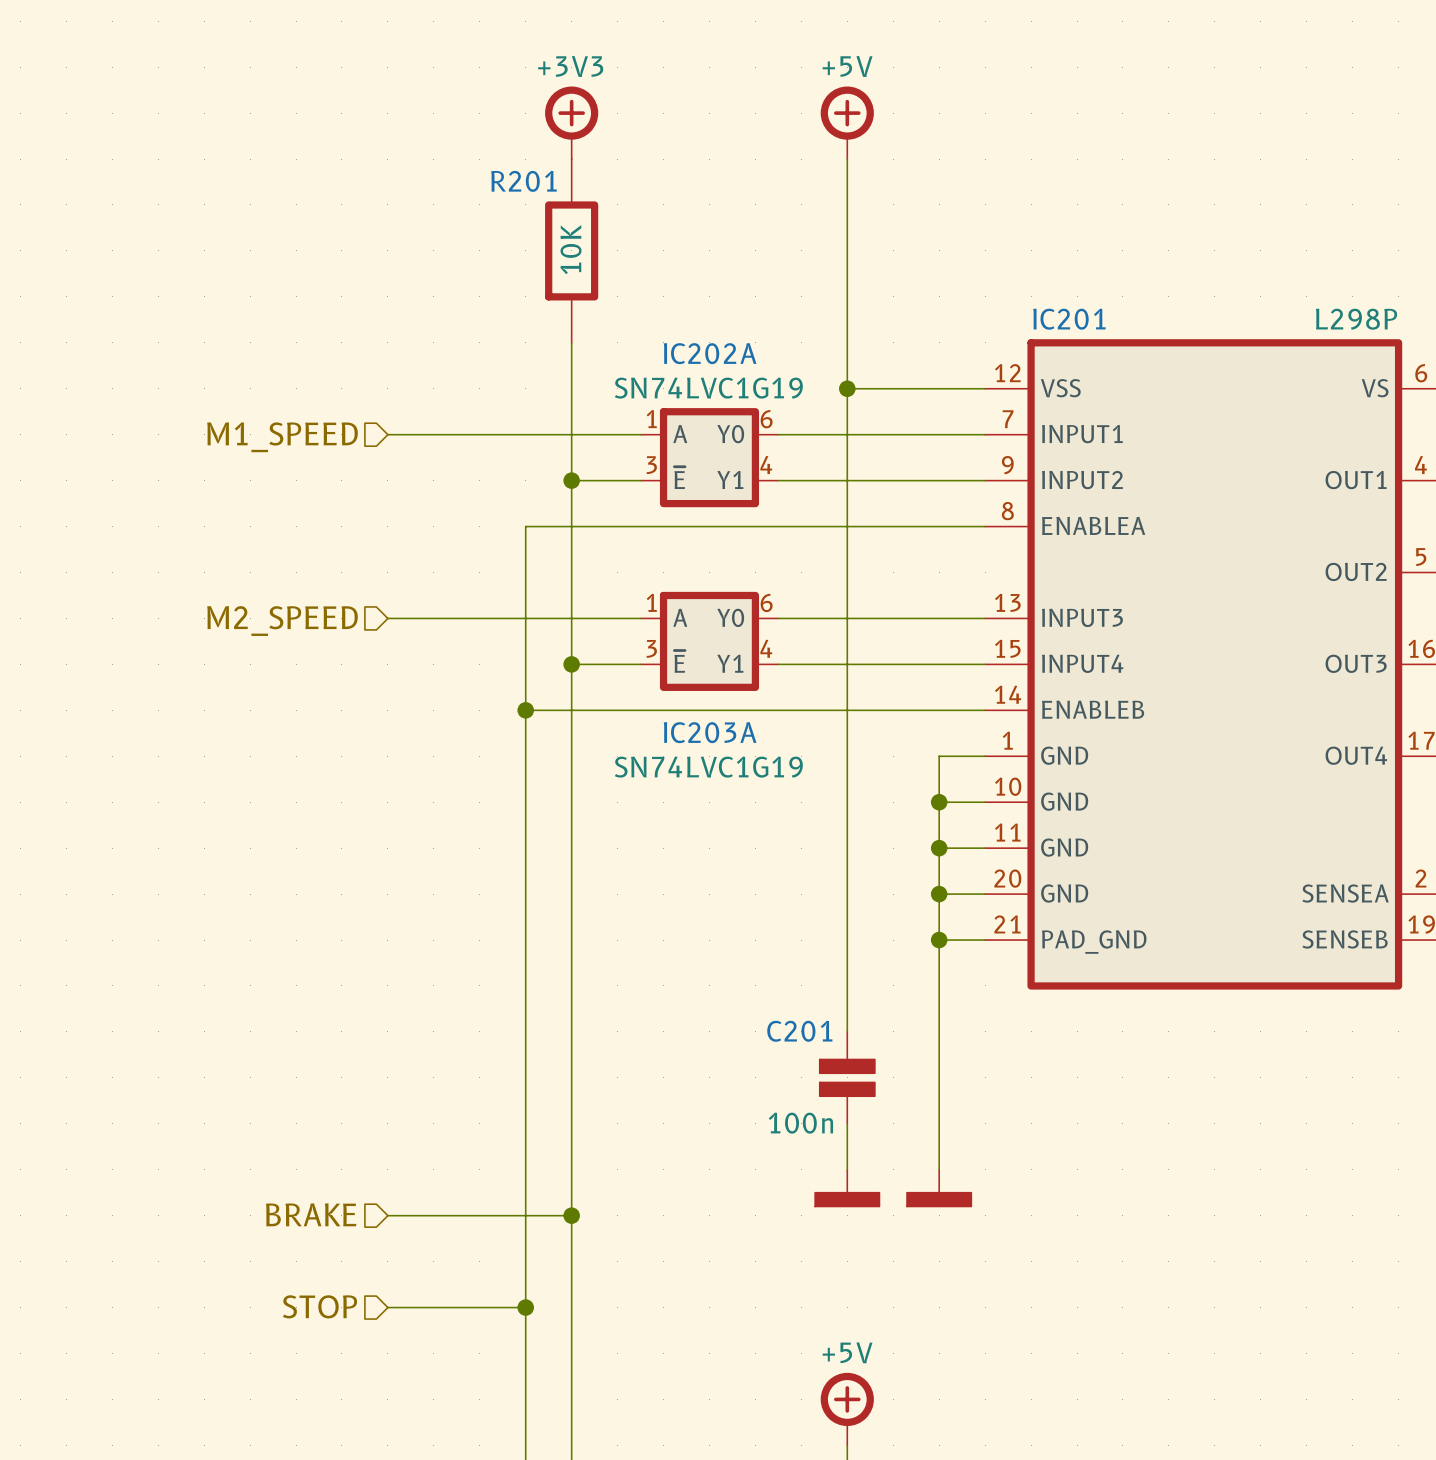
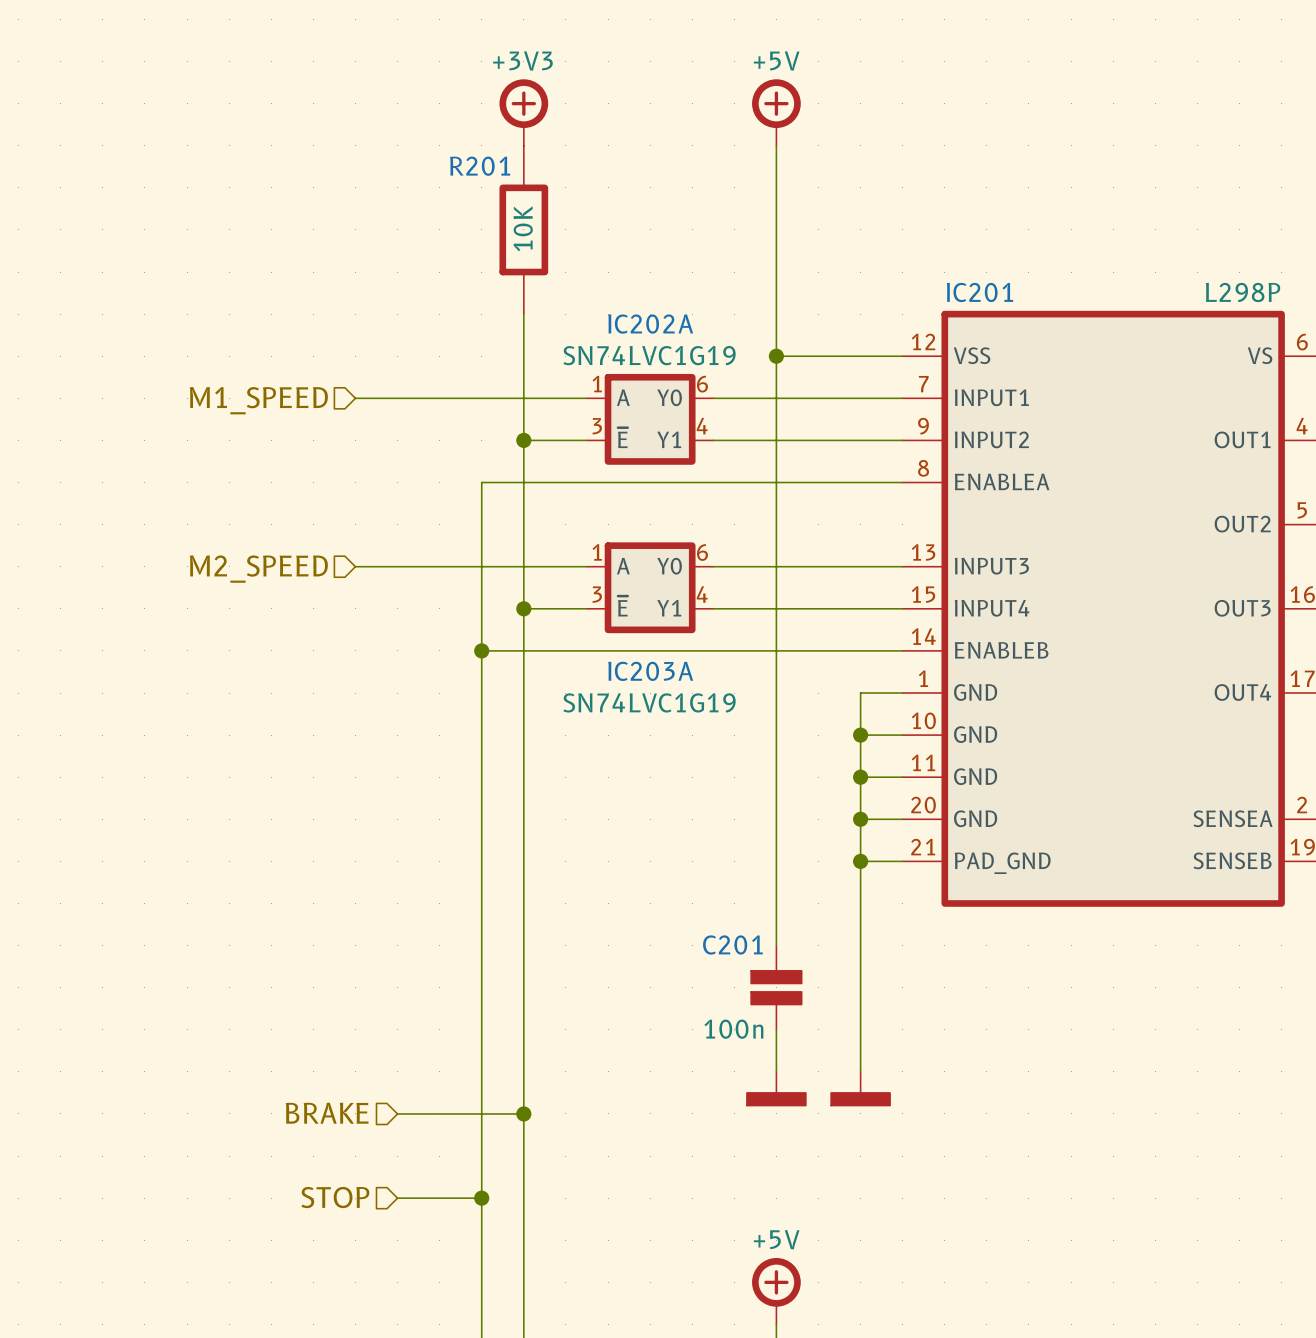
hierarchical label position: BRAKE (311, 1214) -> BRAKE (327, 1113)
wire: (387, 1215) (433, 1215) -> none
hierarchical label position: STOP (319, 1306) -> STOP (335, 1197)
wire: (387, 1307) (433, 1307) -> none

